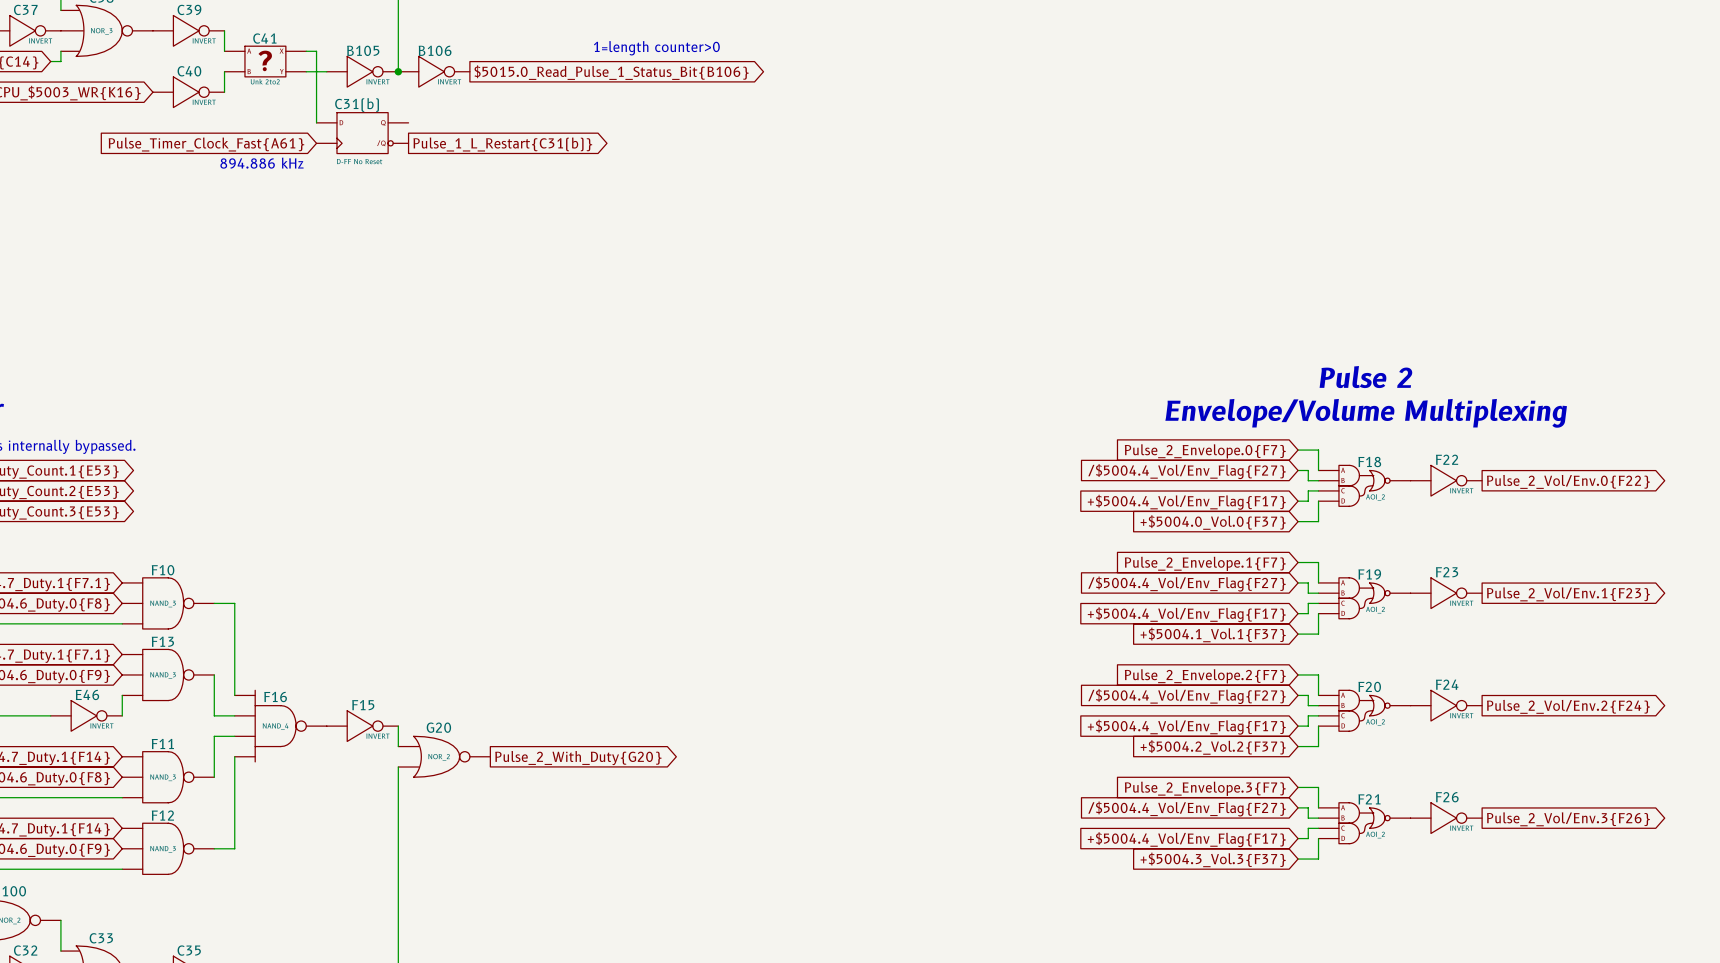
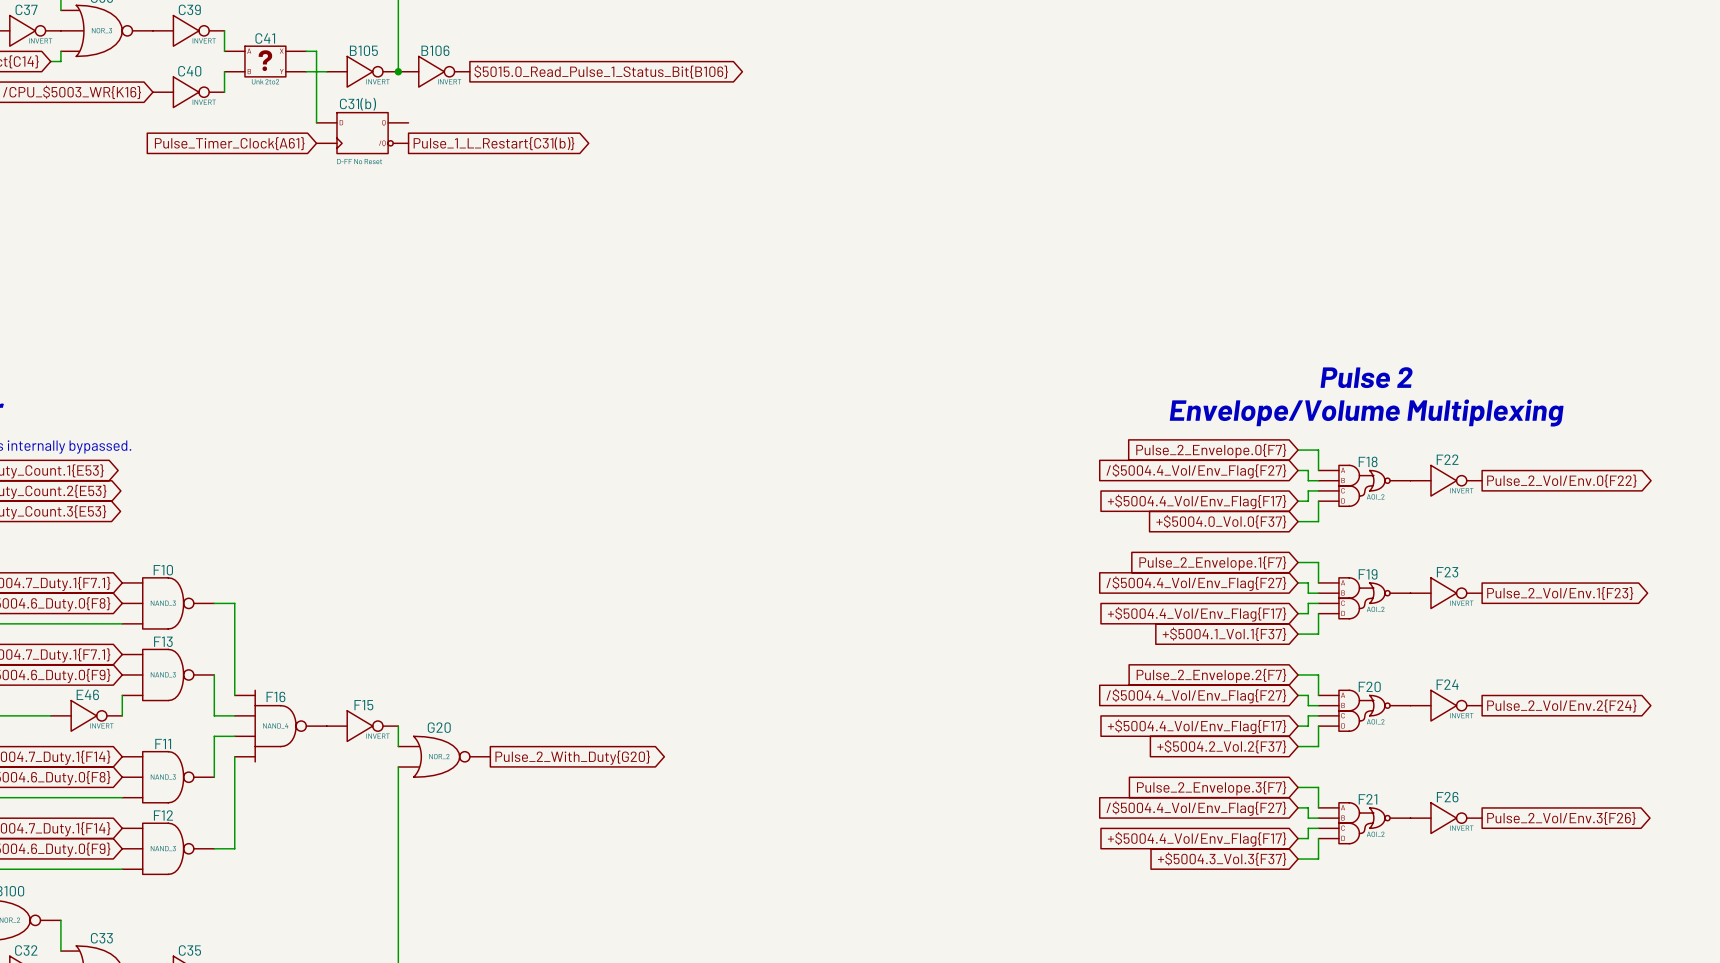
text: 1=length counter>0 (656, 48) -> none
global label: Pulse_Timer_Clock_Fast{A61} (206, 144) -> Pulse_Timer_Clock{A61} (229, 143)
text: 894.886 kHz (261, 163) -> none

